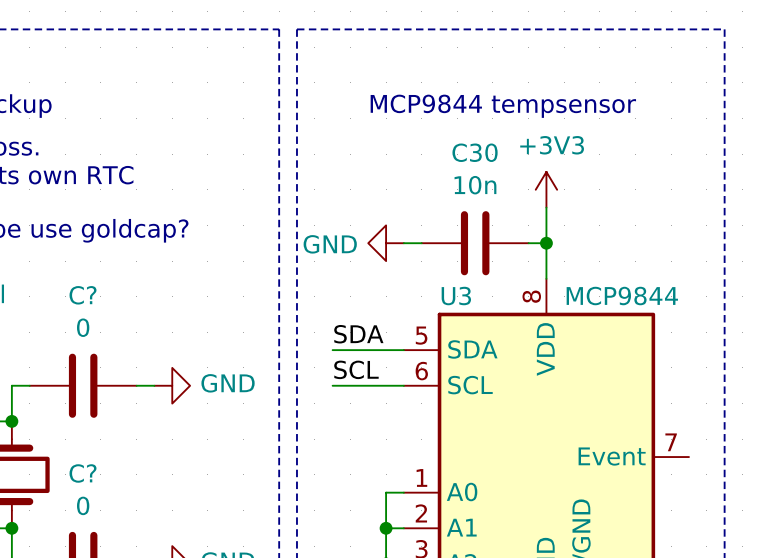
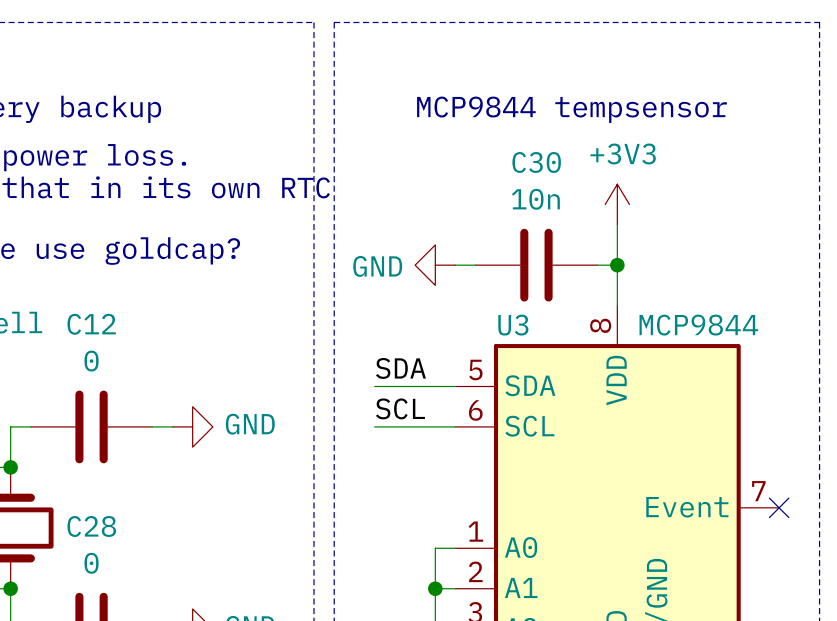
C? name: C? (83, 295) -> C12 (91, 324)
no-connect mark: none -> (779, 507)
C? name: C? (83, 473) -> C28 (91, 526)

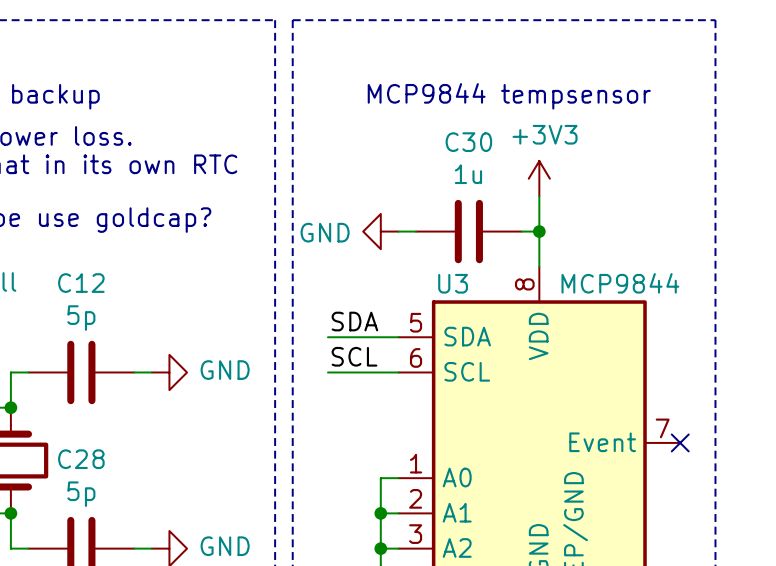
C30 value: 10n (535, 199) -> 1u (468, 174)
C12 value: 0 (91, 361) -> 5p (81, 318)
C28 value: 0 (91, 563) -> 5p (81, 494)

